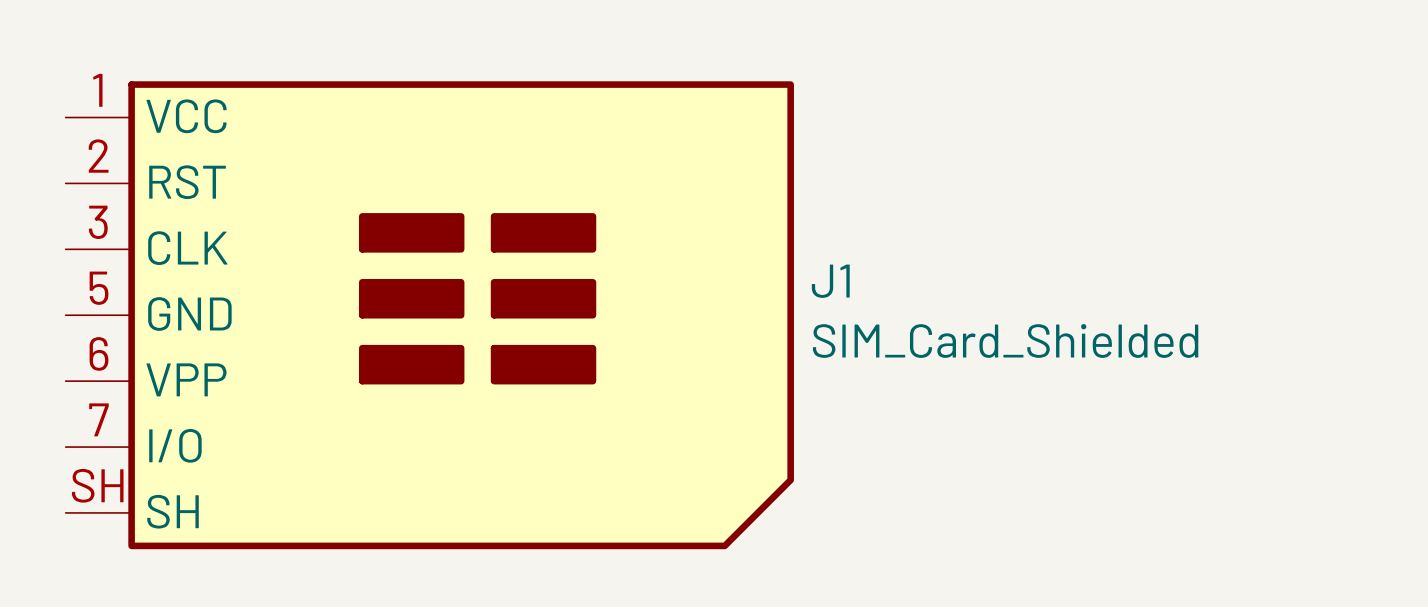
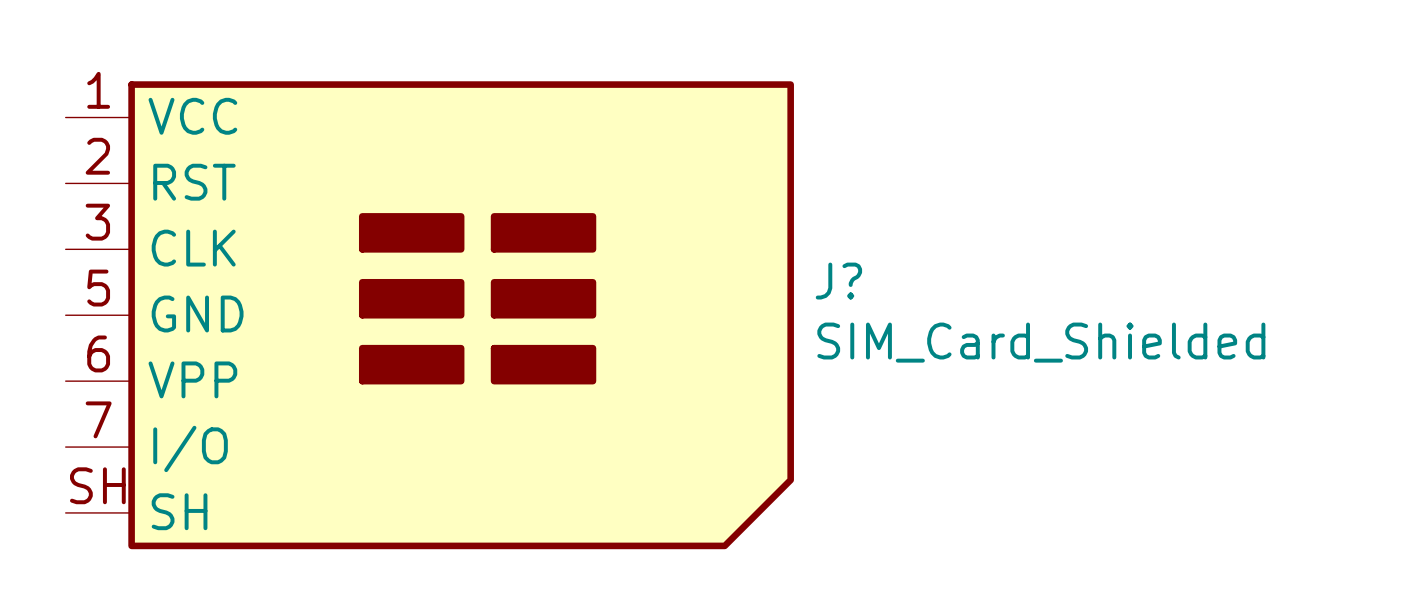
J1 name: J1 (830, 281) -> J? (838, 281)

